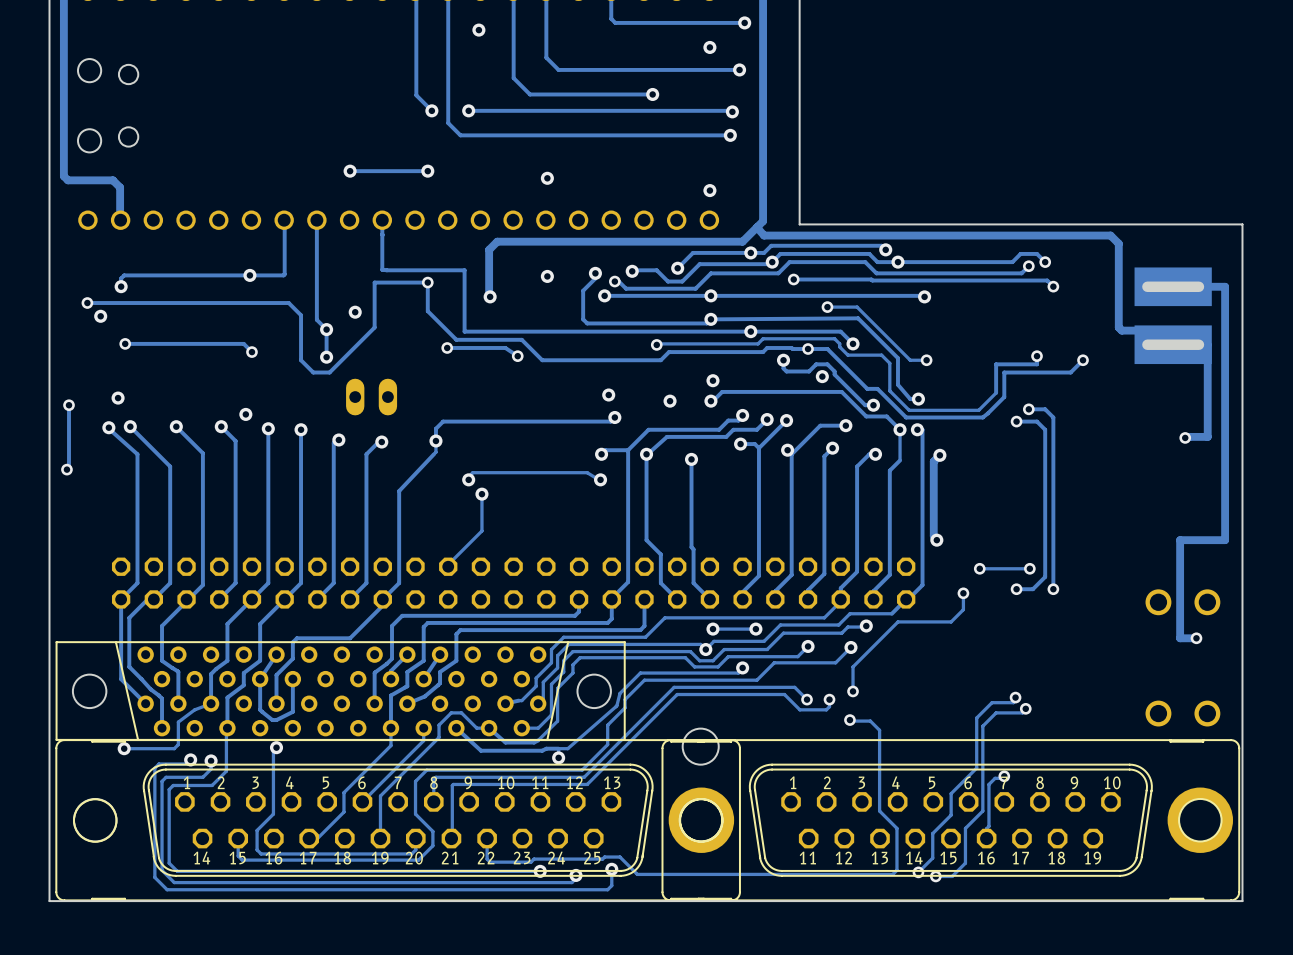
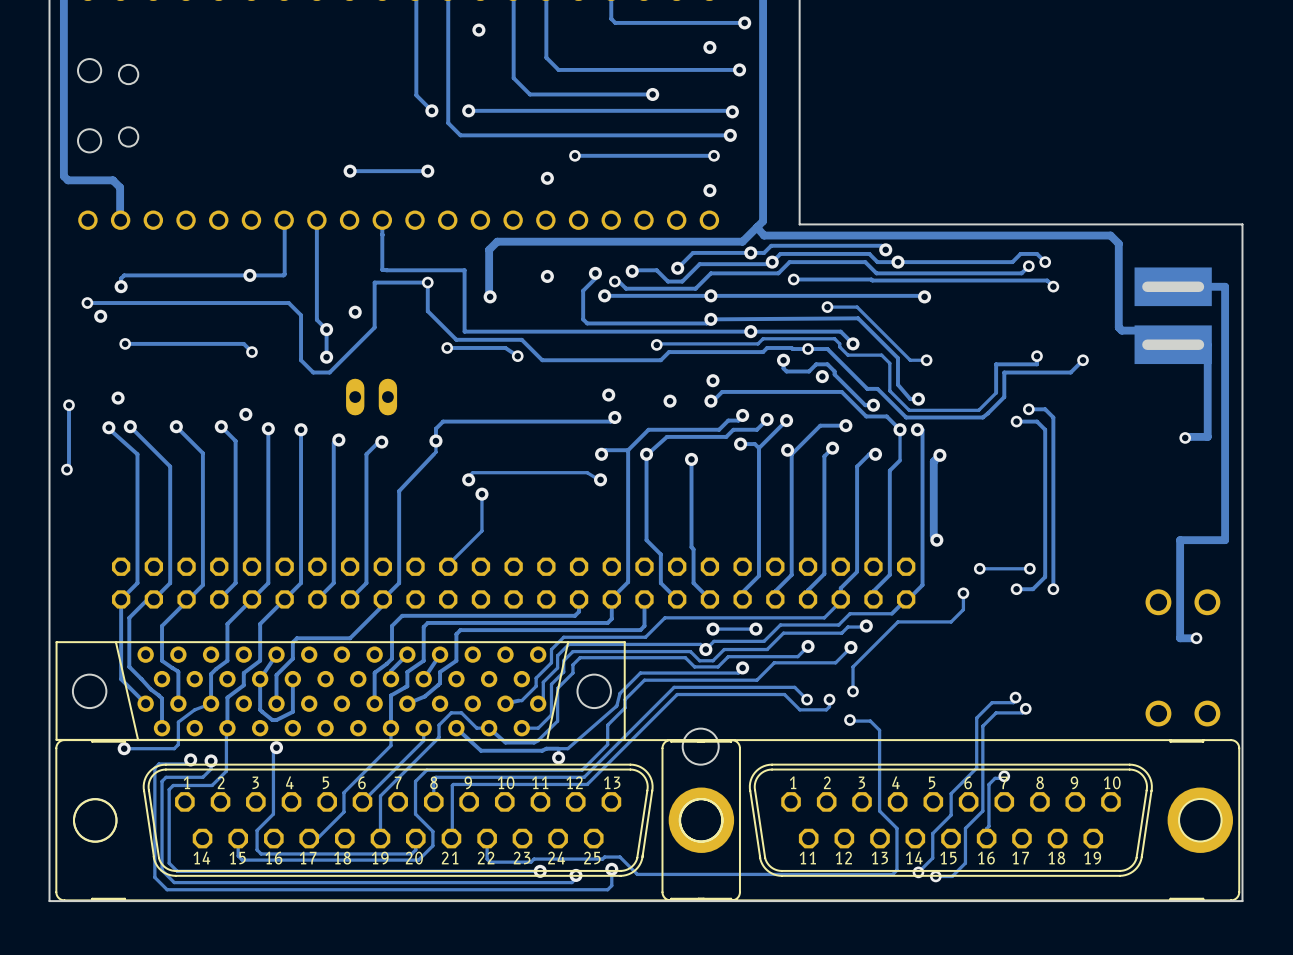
via: none -> (574, 155)
track: none -> (714, 155) (574, 155)
via: none -> (714, 155)

